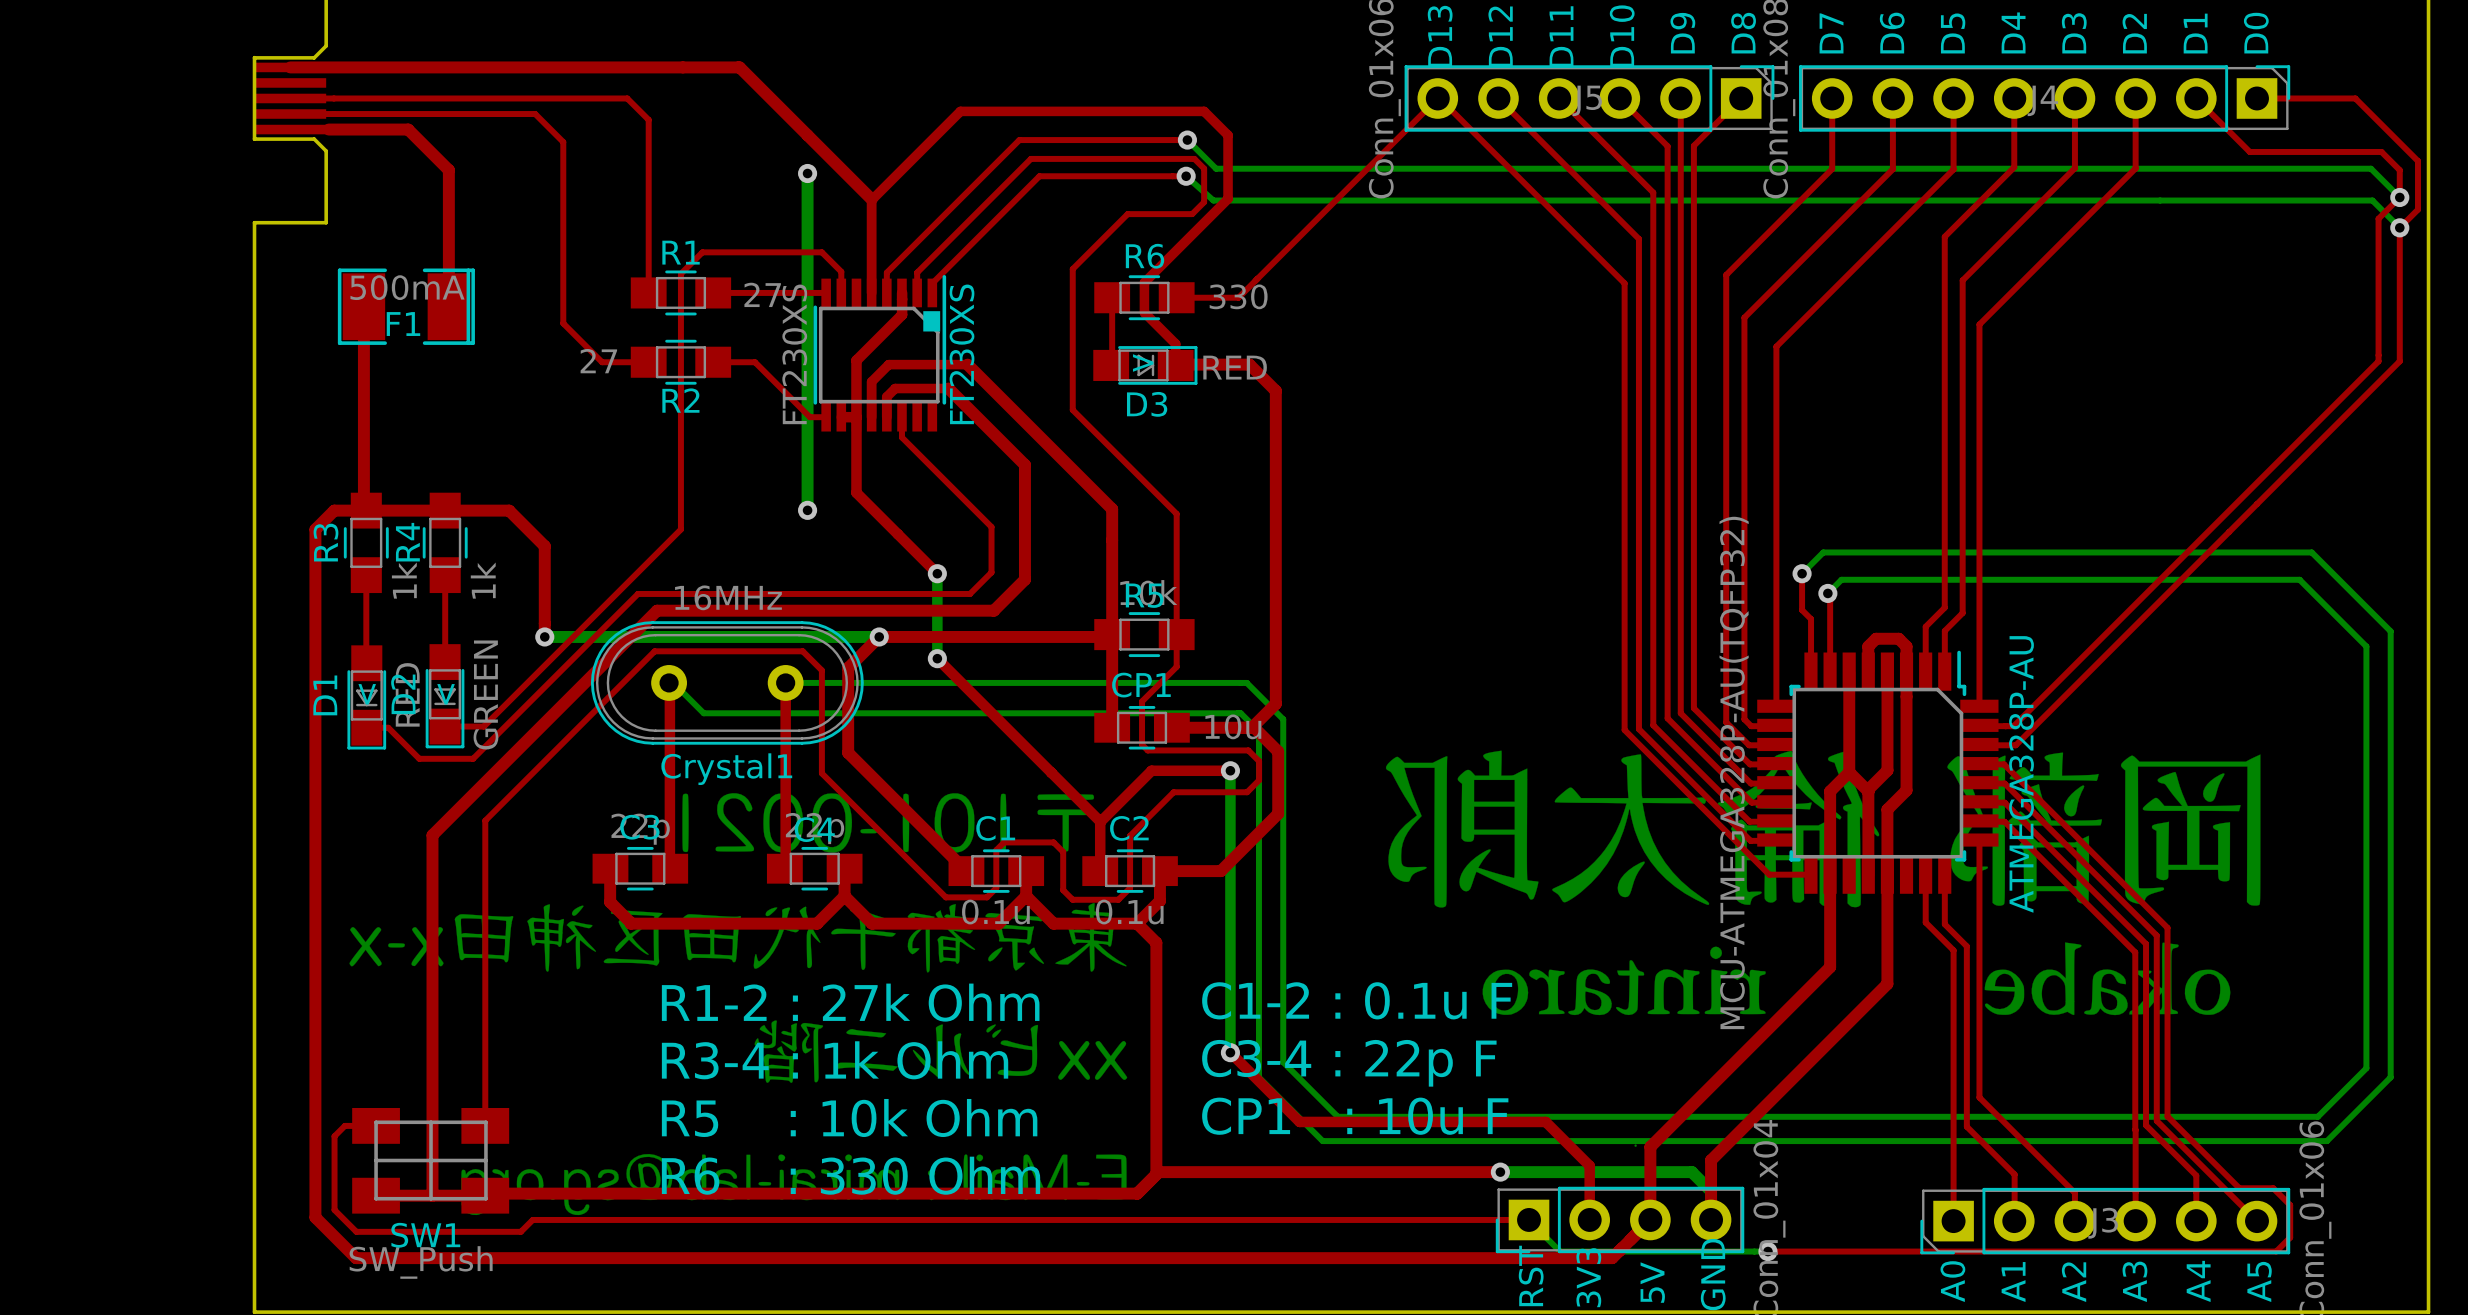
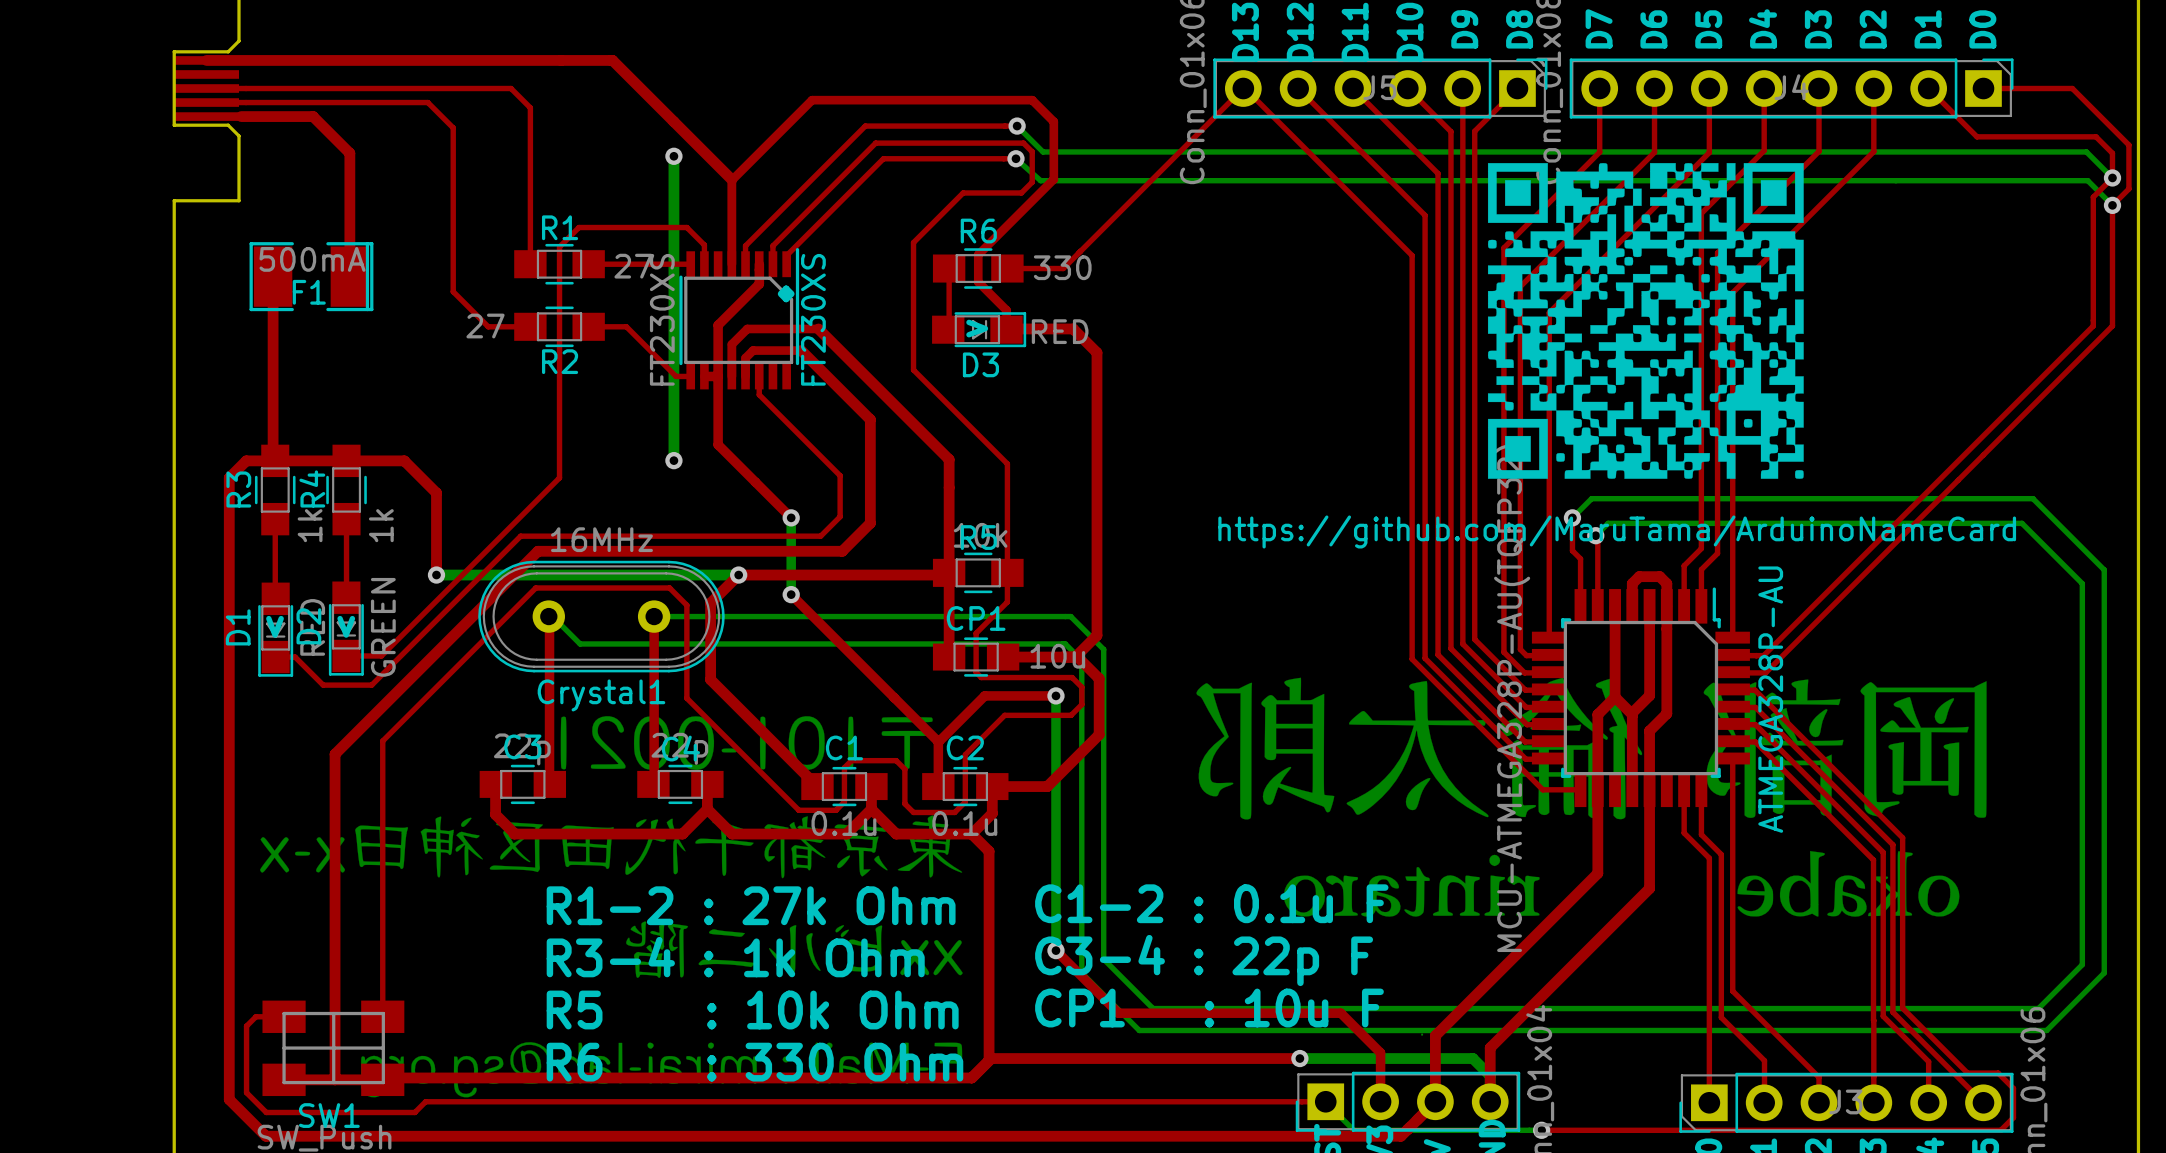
drawing: none -> [1487, 163, 1804, 479]
text: none -> https://github.com/MaruTama/ArduinoNameCard (1617, 531)

